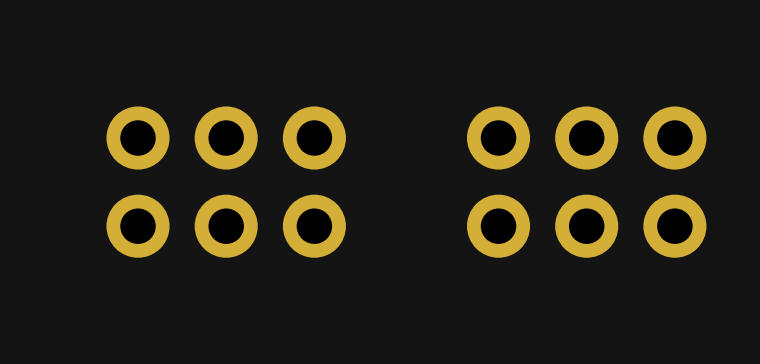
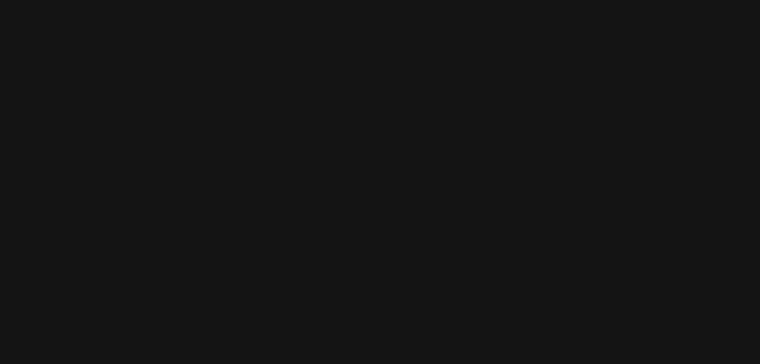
part: (226, 182) -> none
part: (586, 182) -> none

